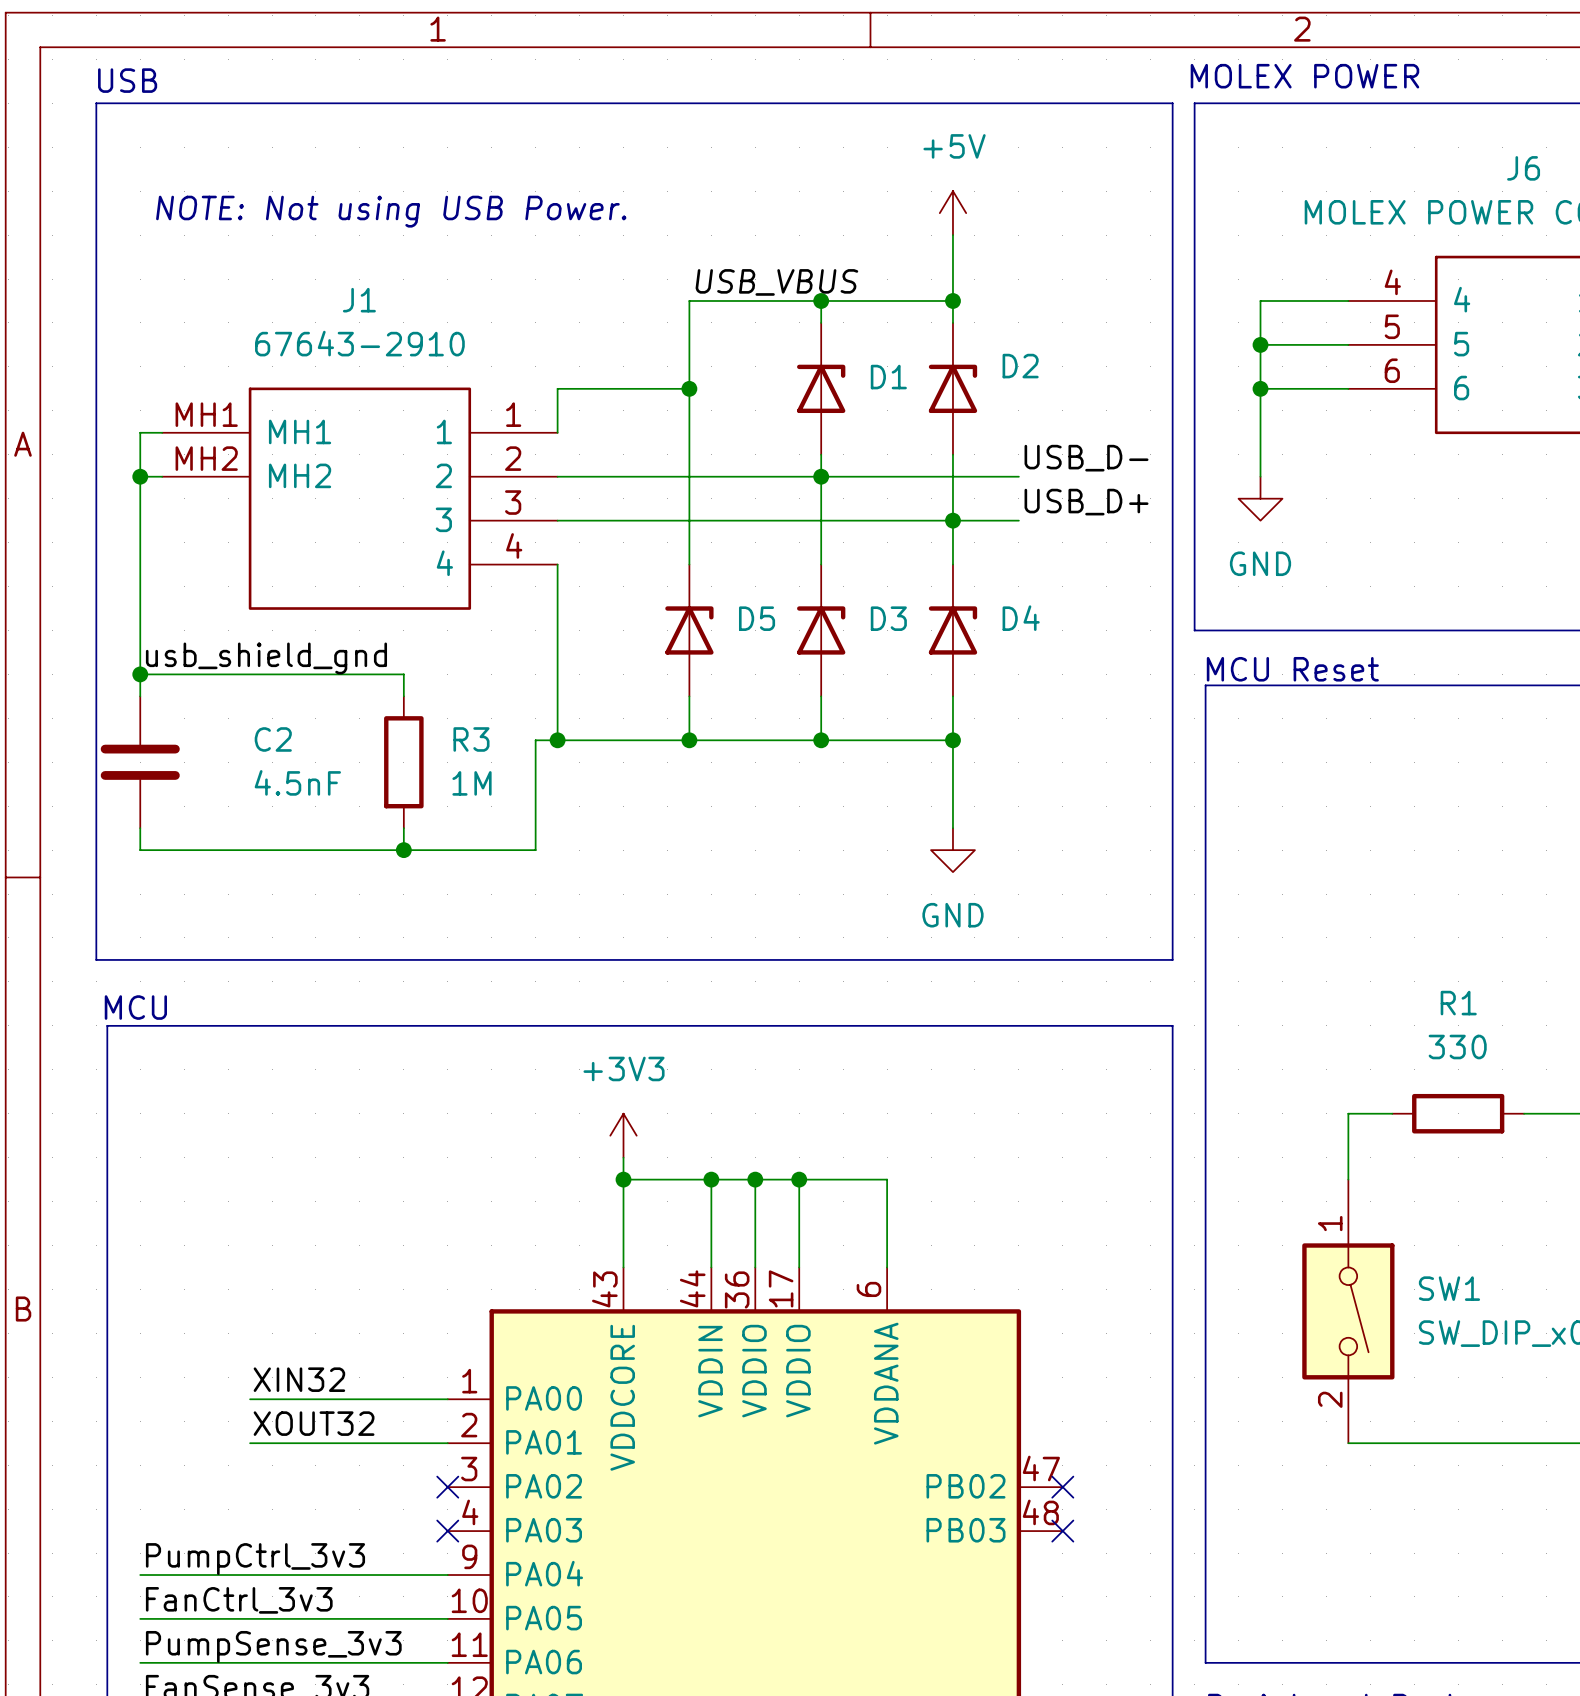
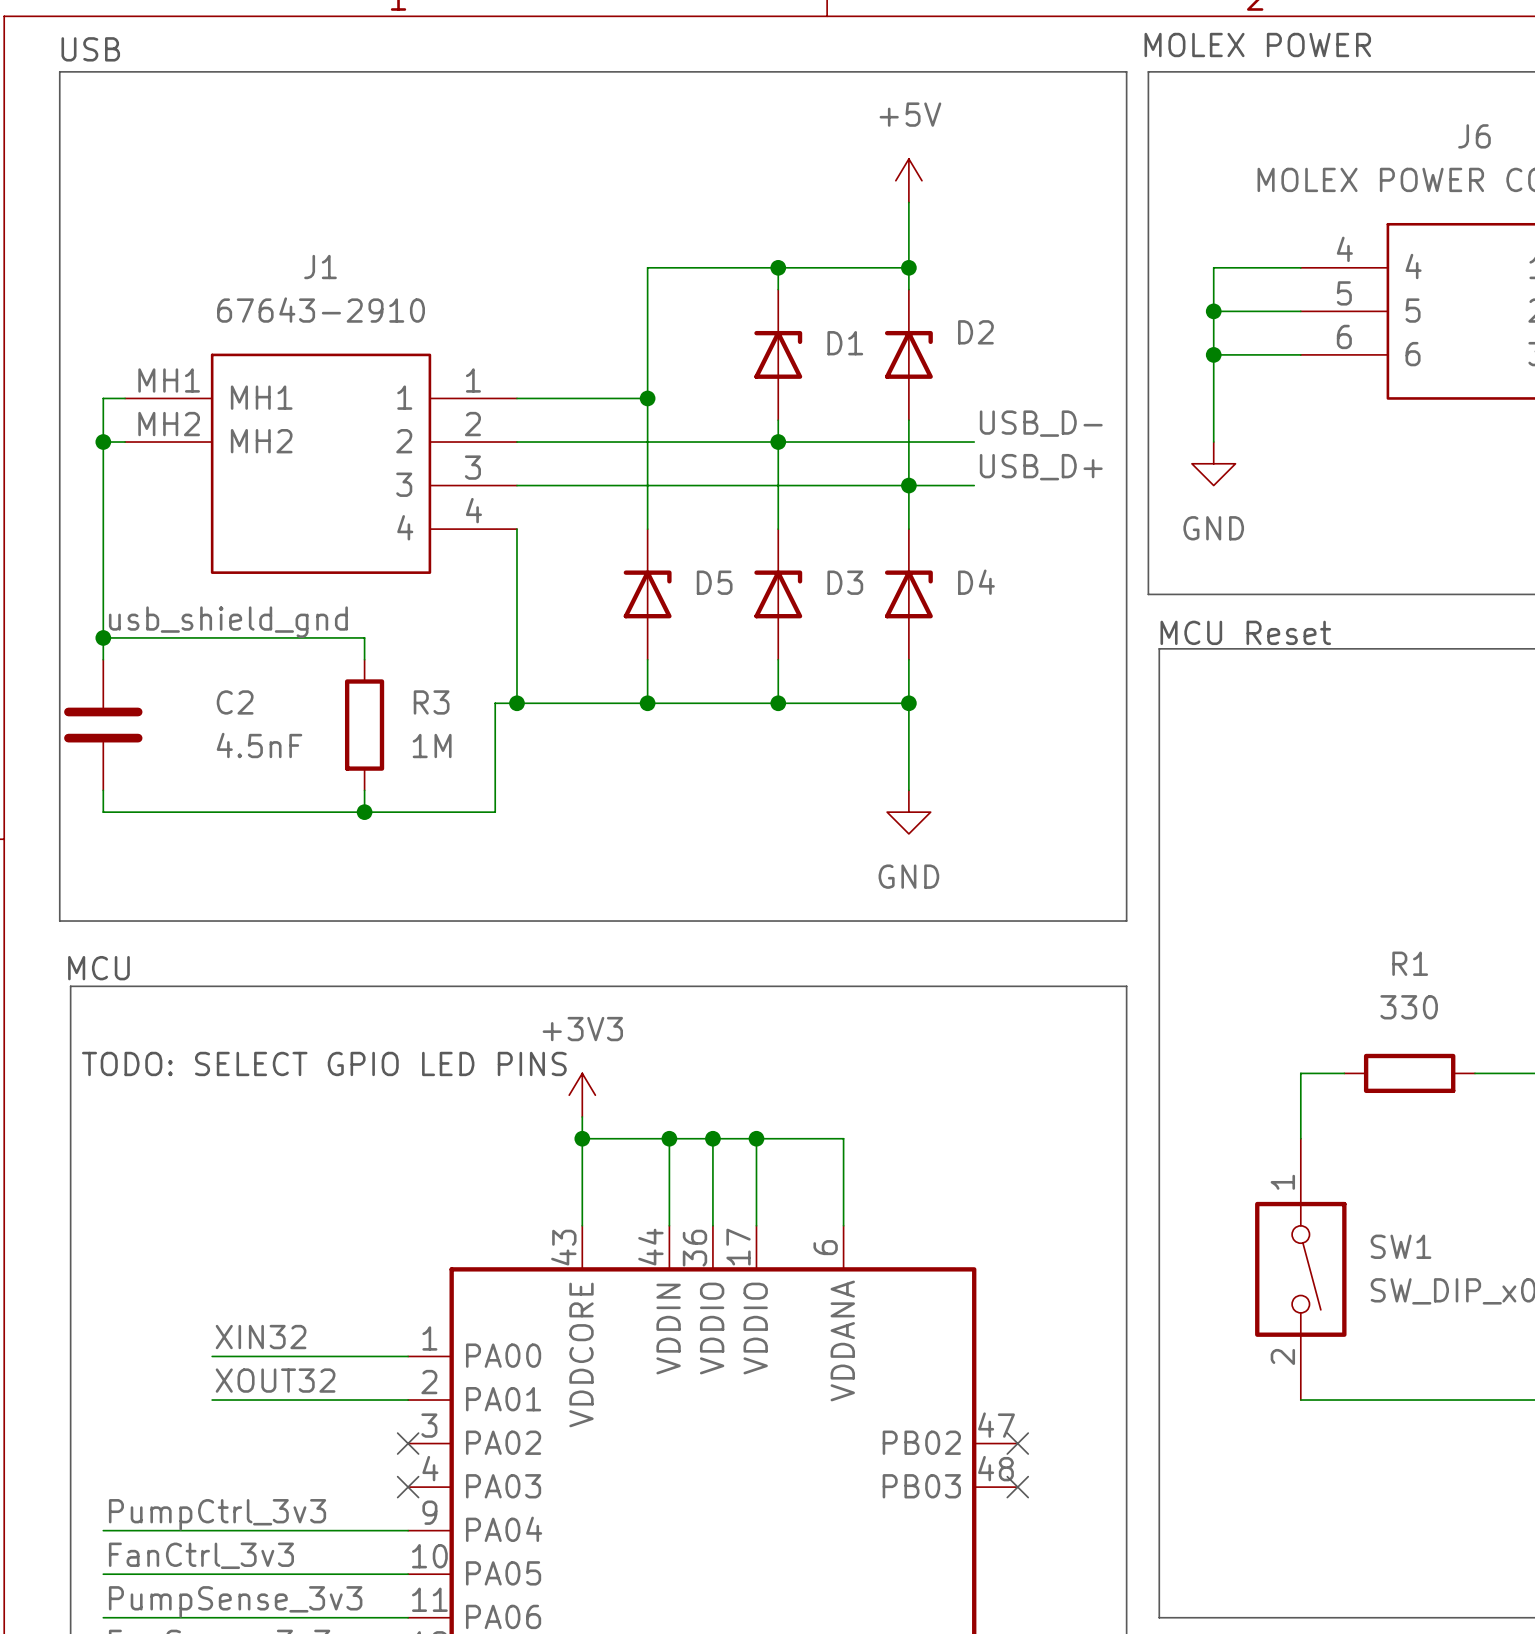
text: NOTE: Not using USB Power. (391, 211) -> none
label: USB_VBUS (776, 282) -> none
wire: (689, 388) (557, 388) (557, 432) -> (647, 398) (516, 398)
junction position: (689, 388) -> (647, 398)
text: none -> TODO: SELECT GPIO LED PINS (324, 1063)

